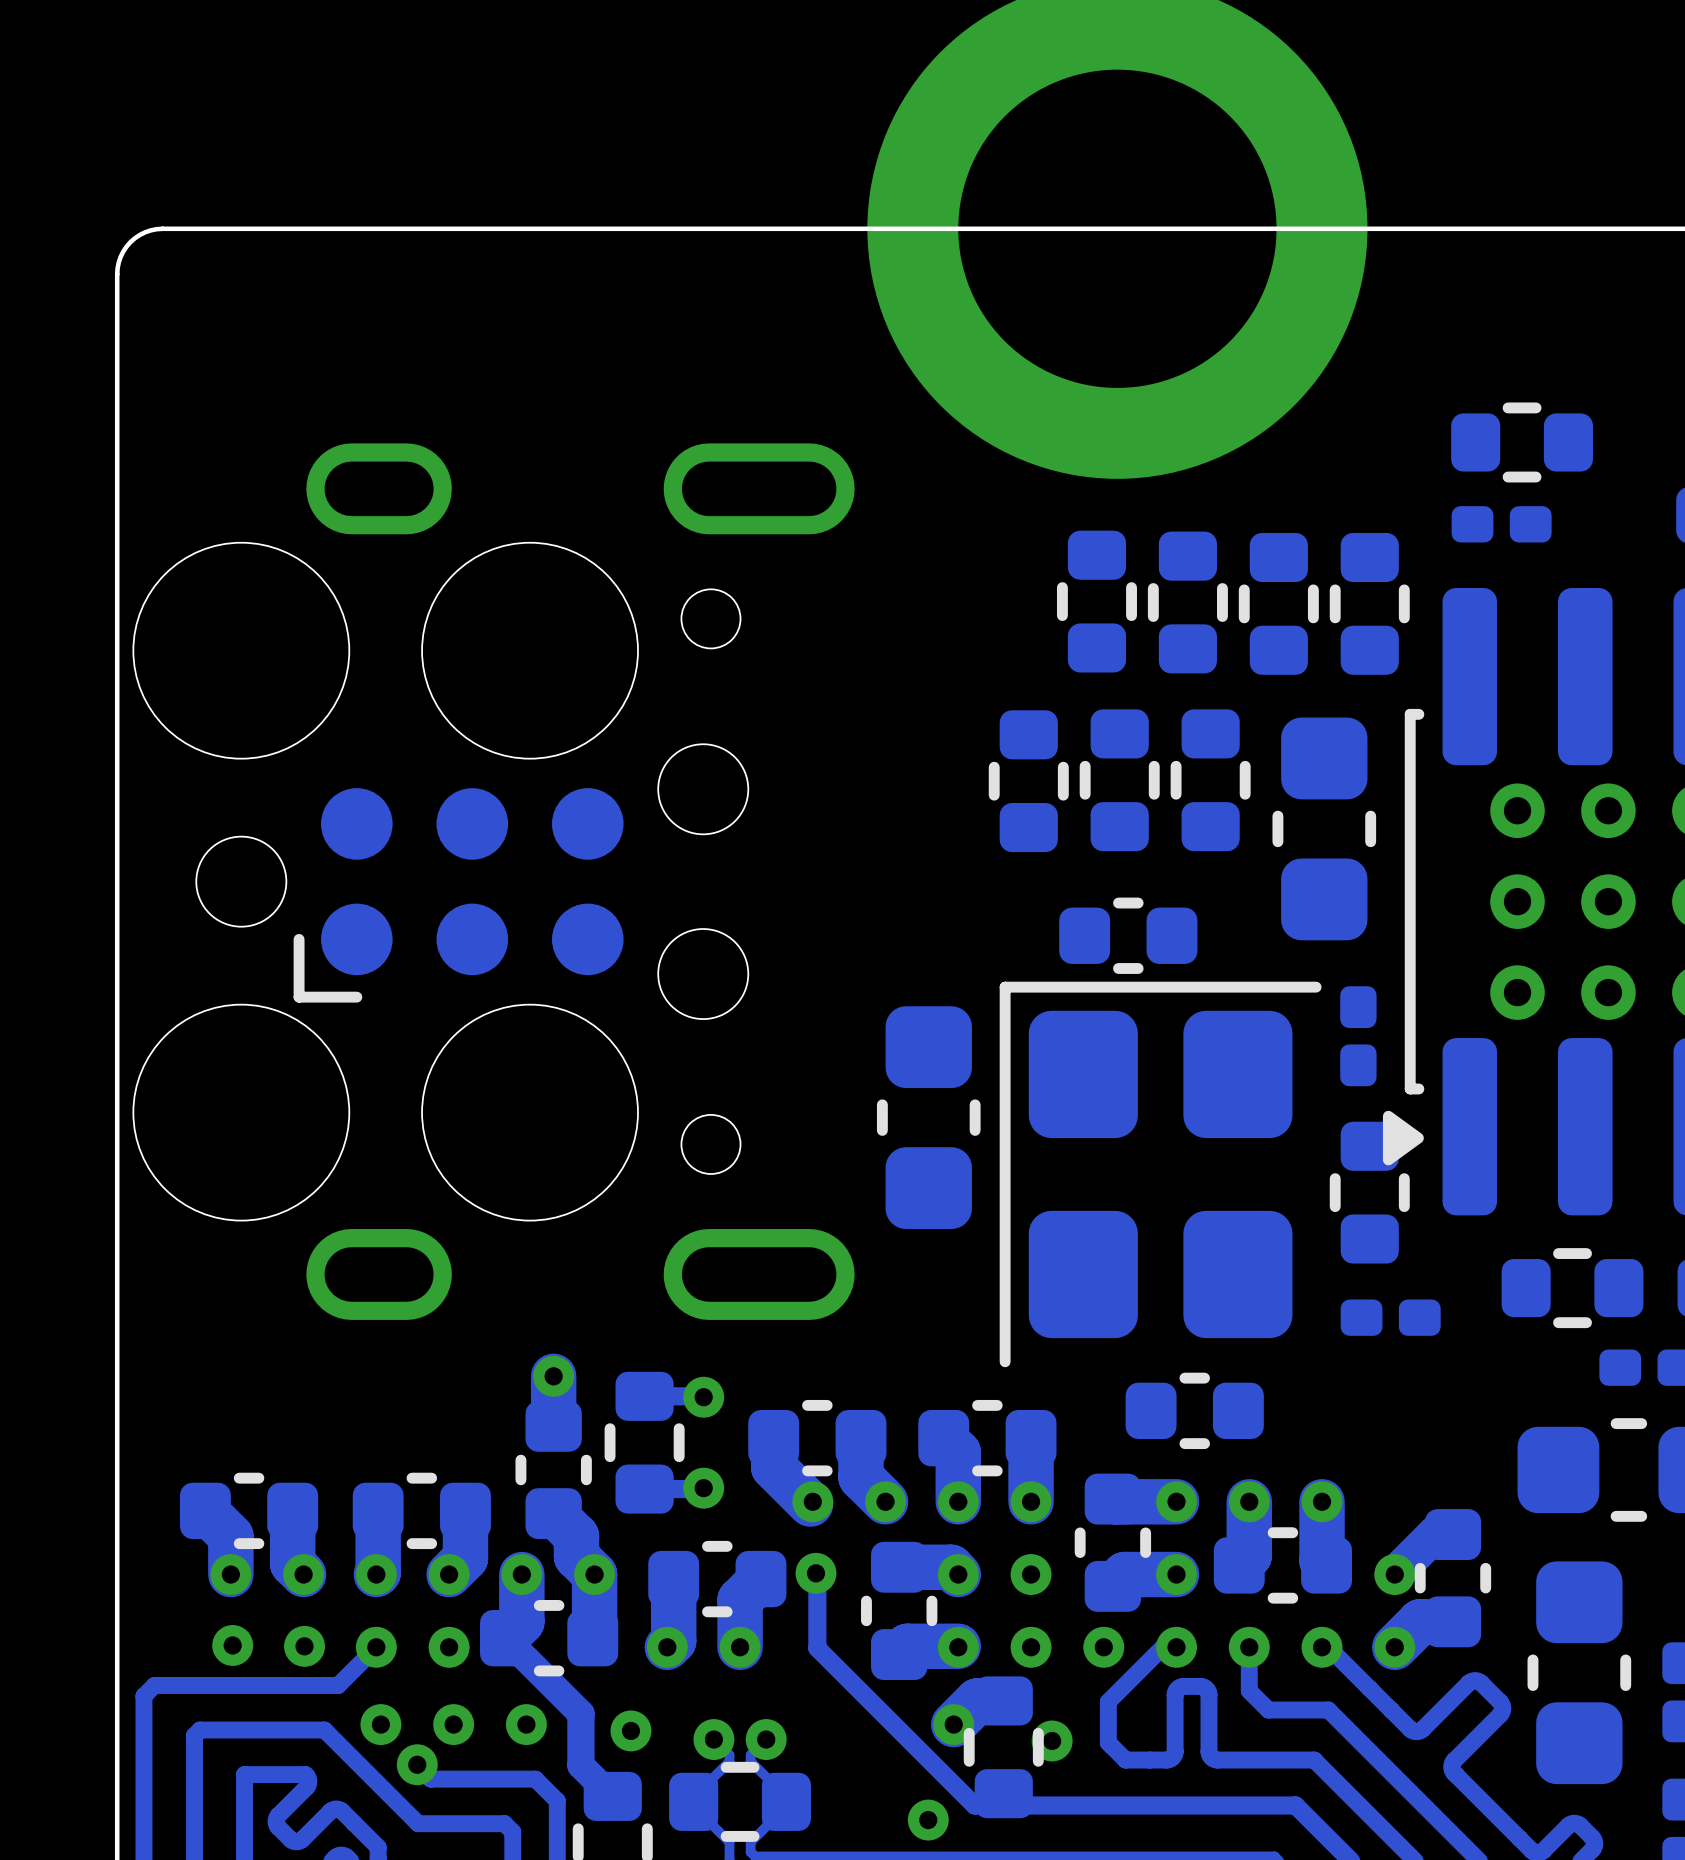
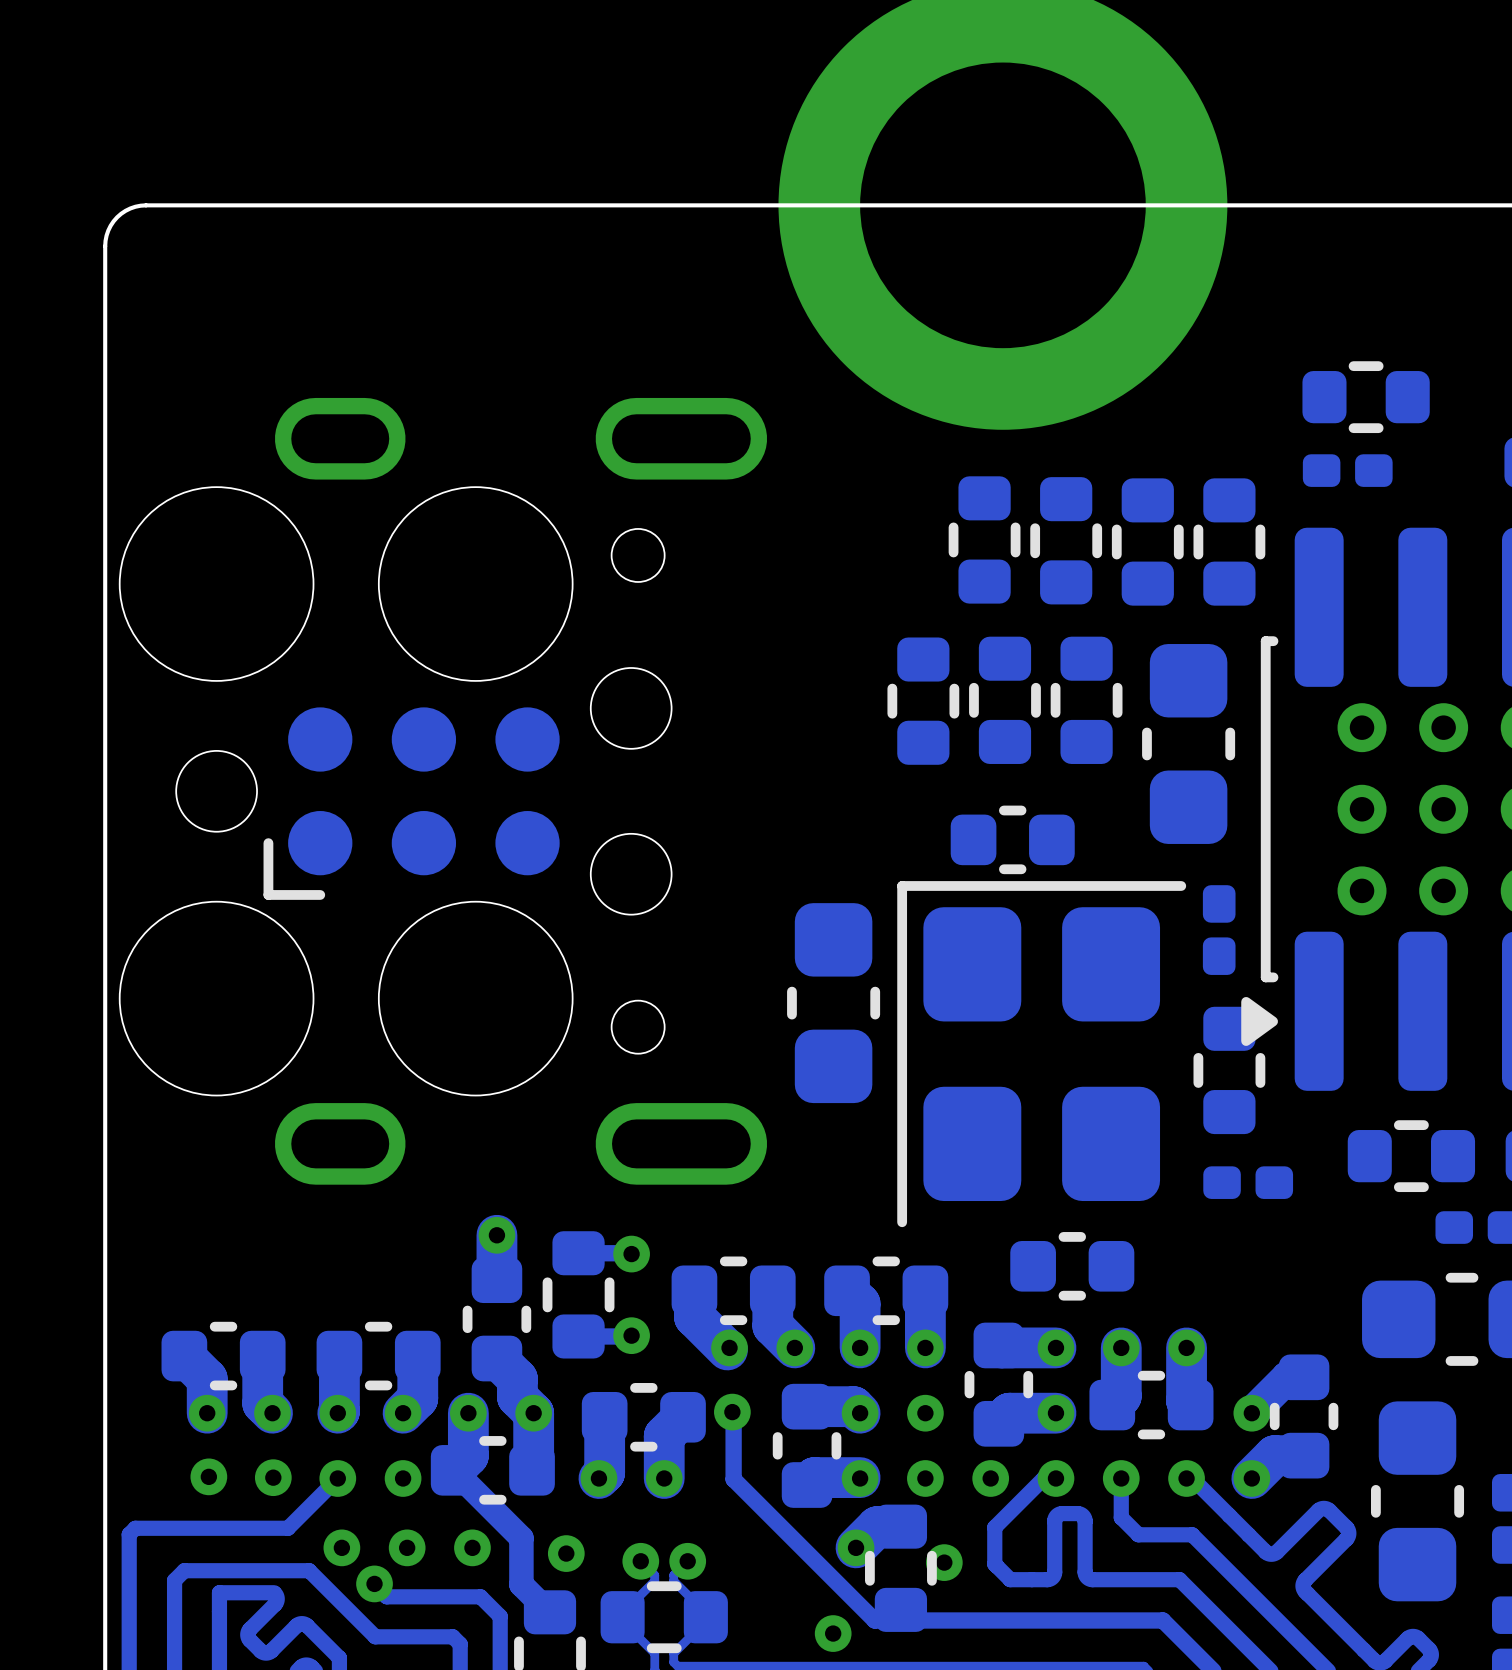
track: (338, 1685) (154, 1685) (143, 1696) (143, 1709) -> (303, 1512) (288, 1528) (135, 1528) (129, 1534)
track: (344, 1750) (324, 1730) (199, 1730) (194, 1735) (194, 1760) -> (309, 1570) (184, 1570) (174, 1580)

